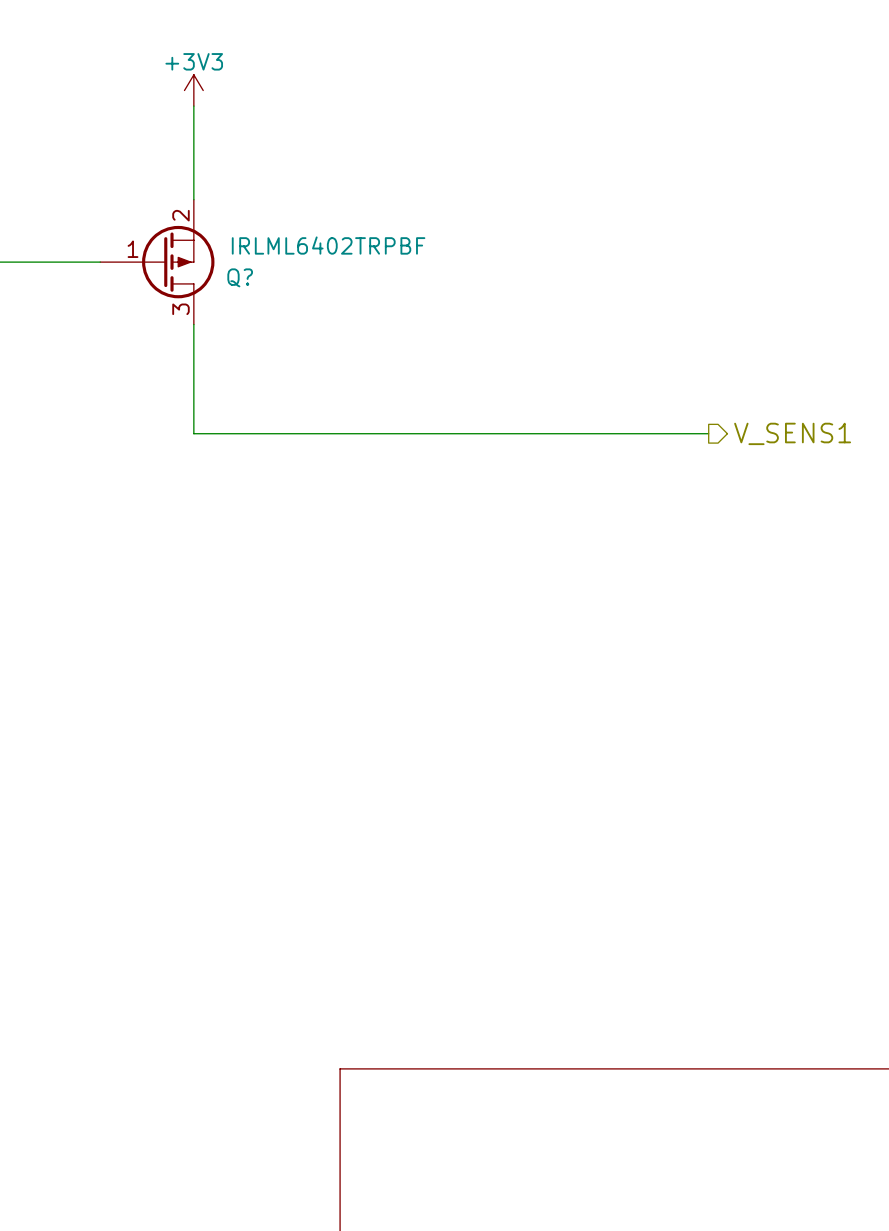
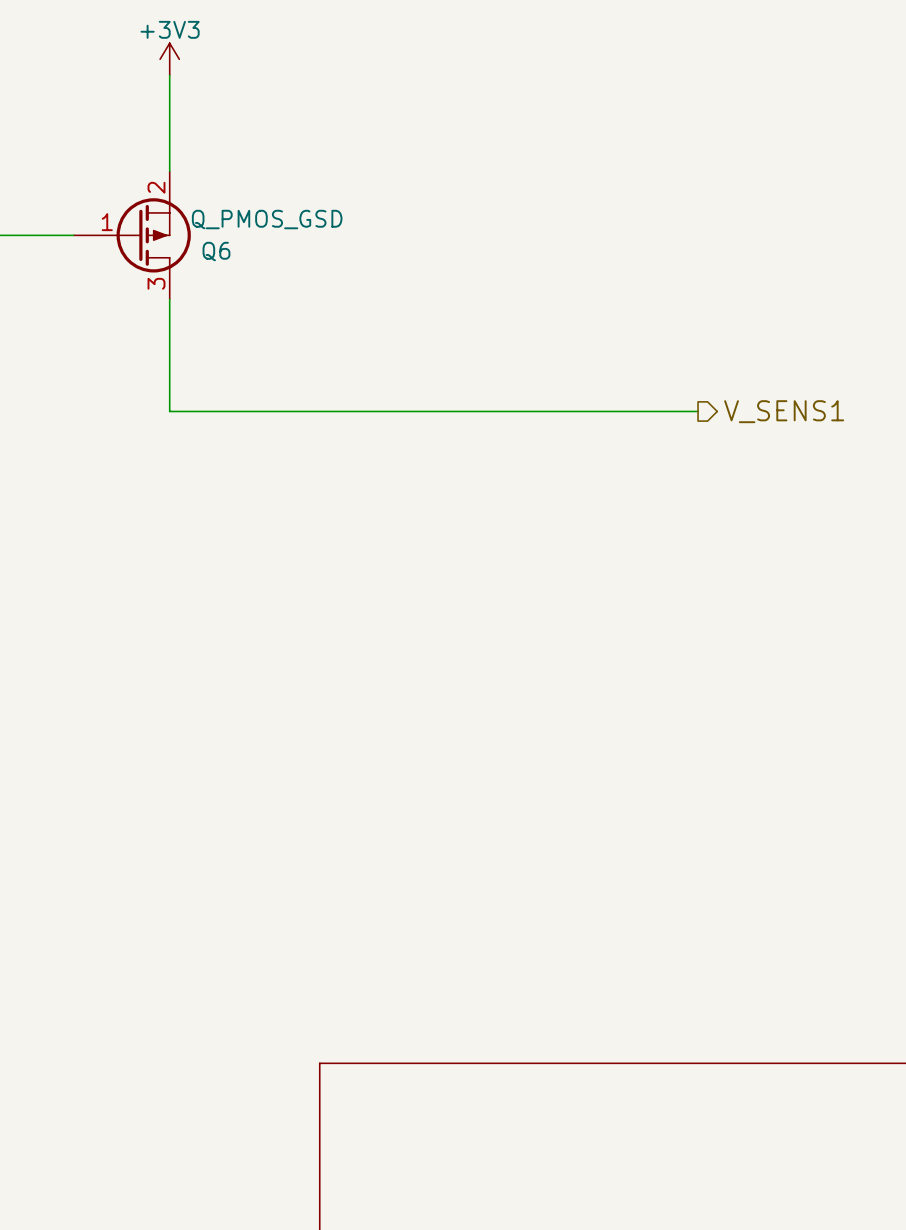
Q? value: IRLML6402TRPBF (328, 245) -> Q_PMOS_GSD (267, 219)
Q? name: Q? (240, 277) -> Q6 (216, 251)

